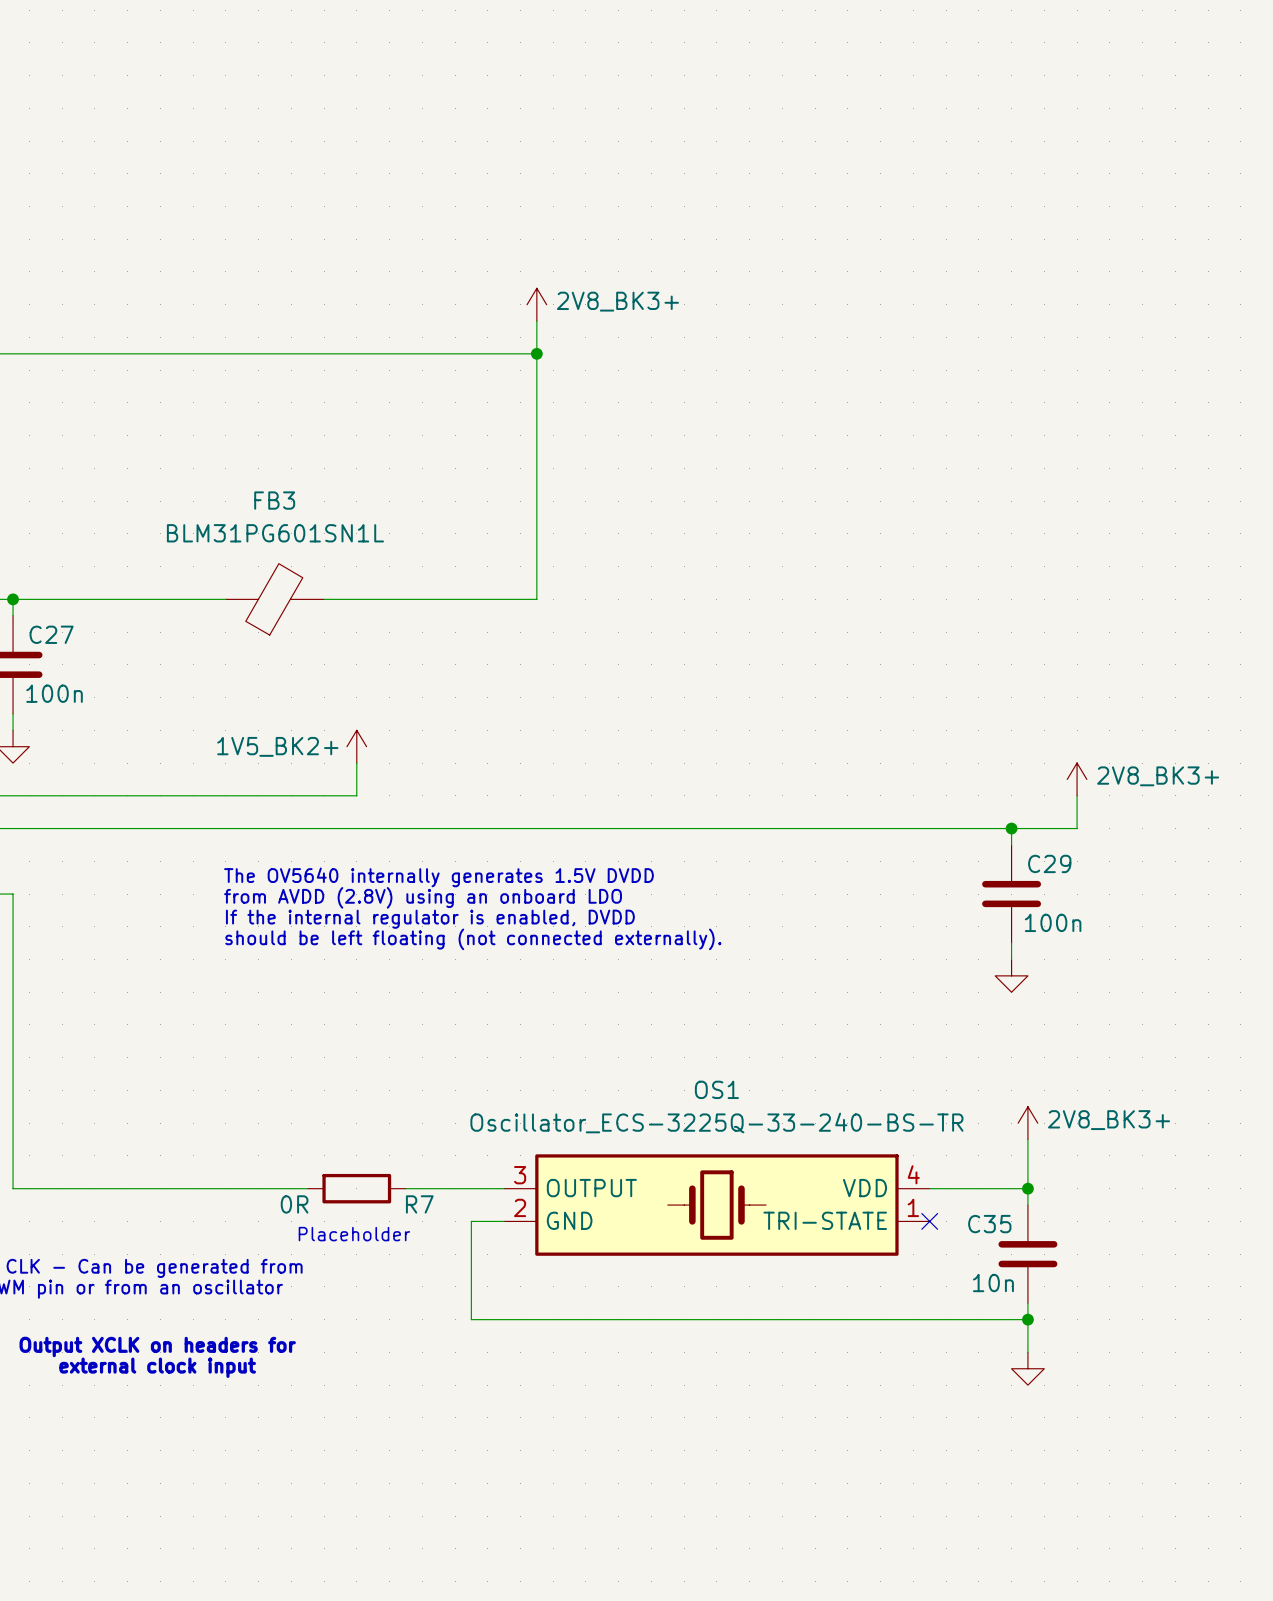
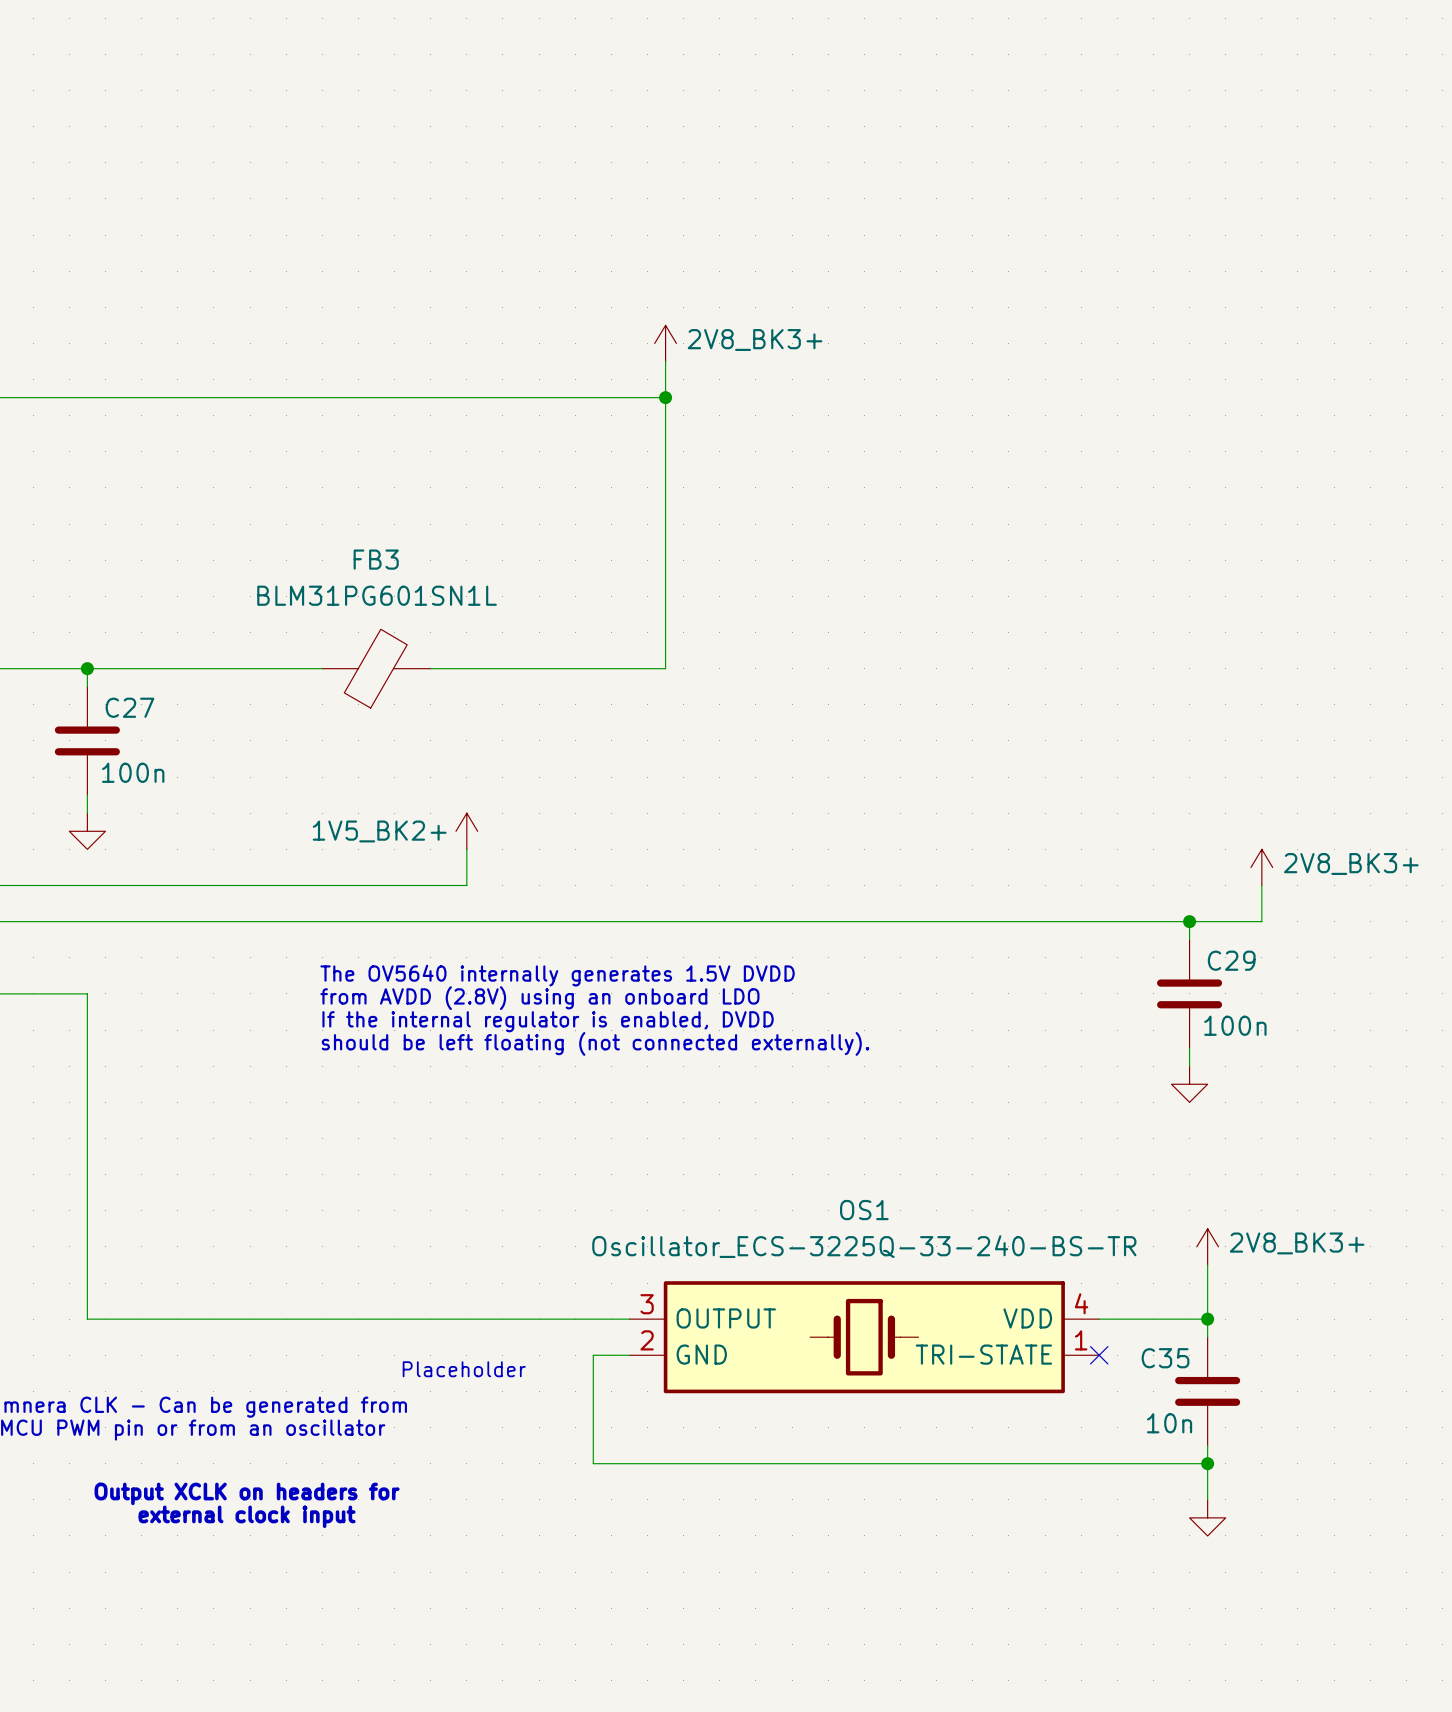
wire: none -> (412, 1319) (521, 1319)
R7: 0R (356, 1188) -> none

